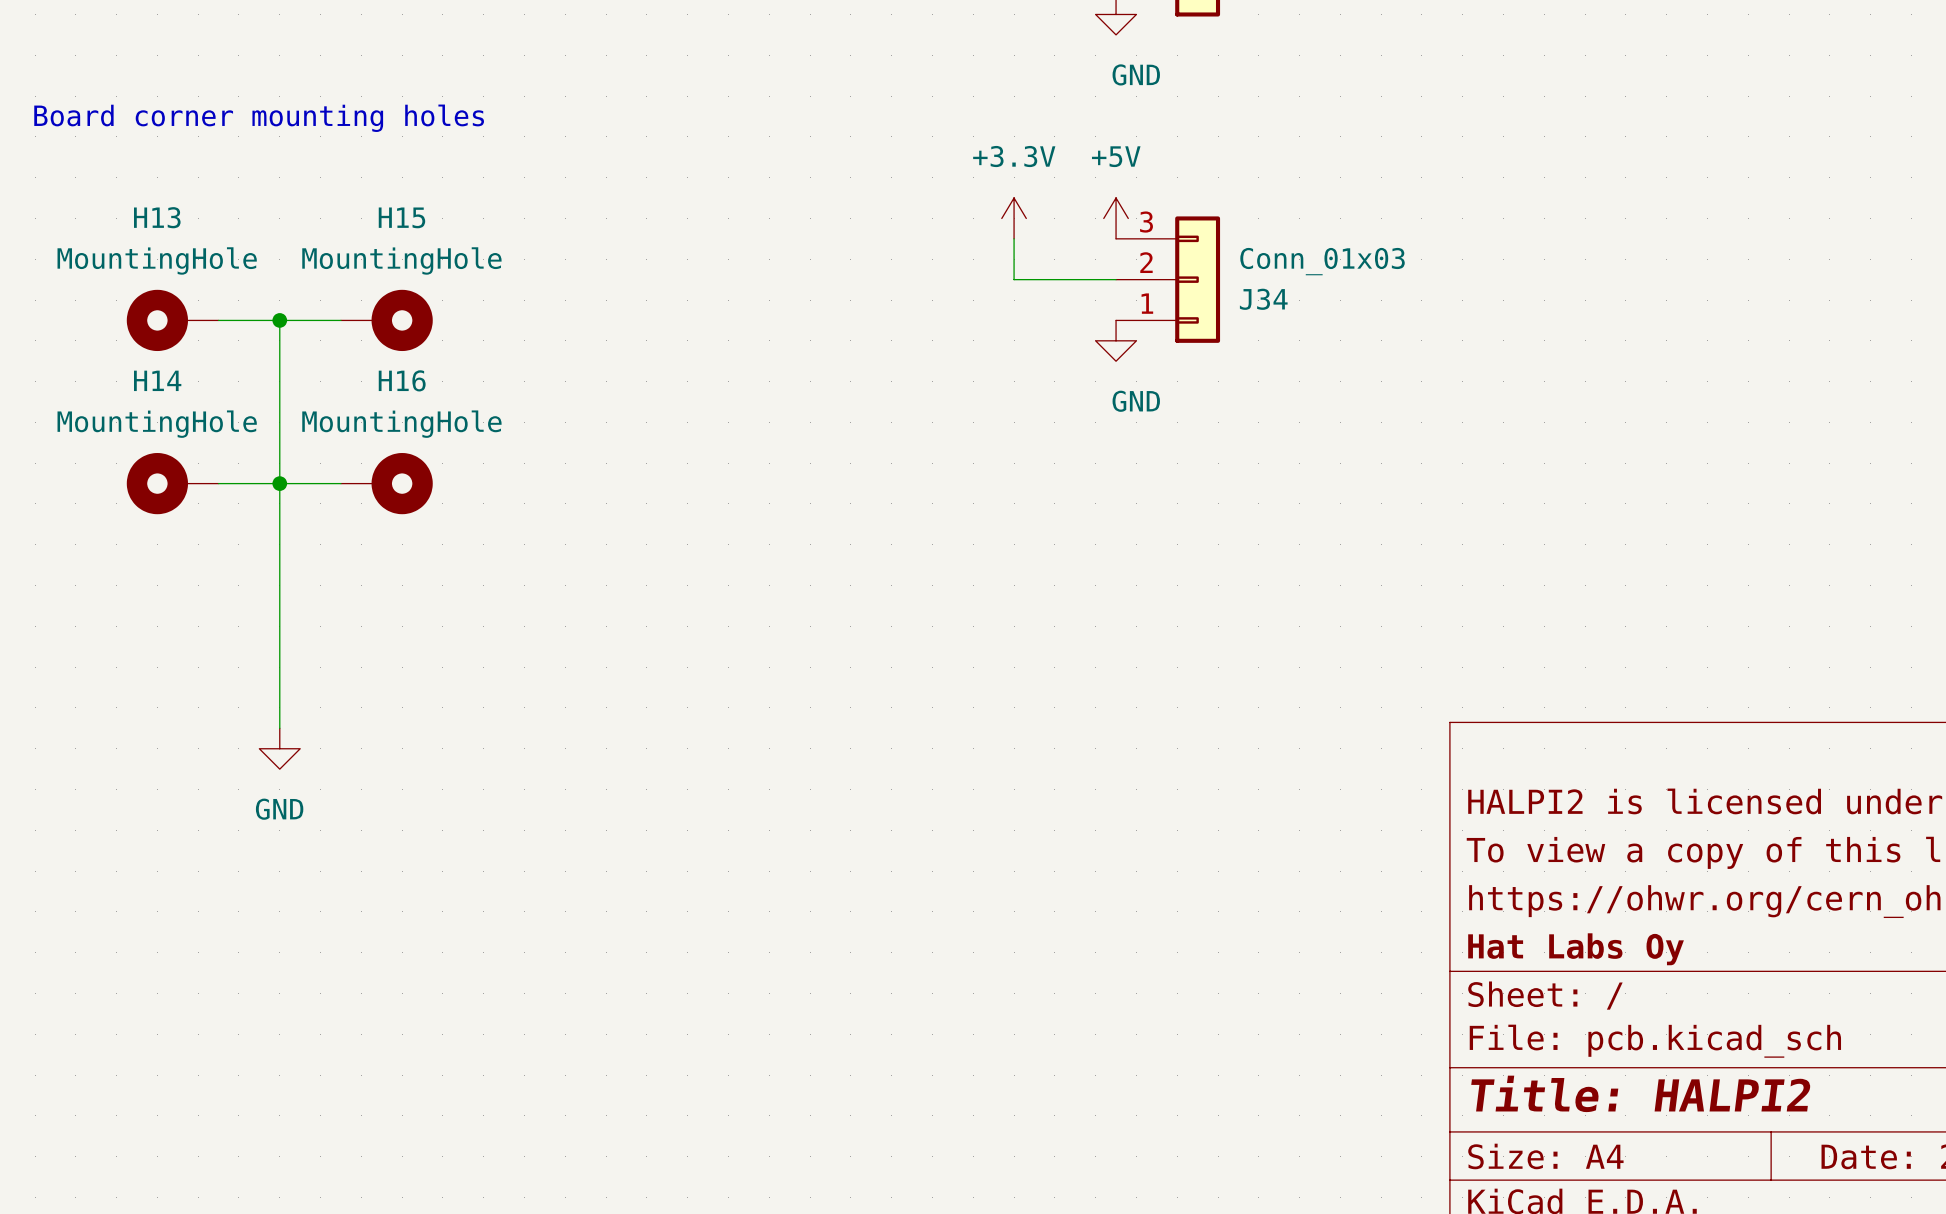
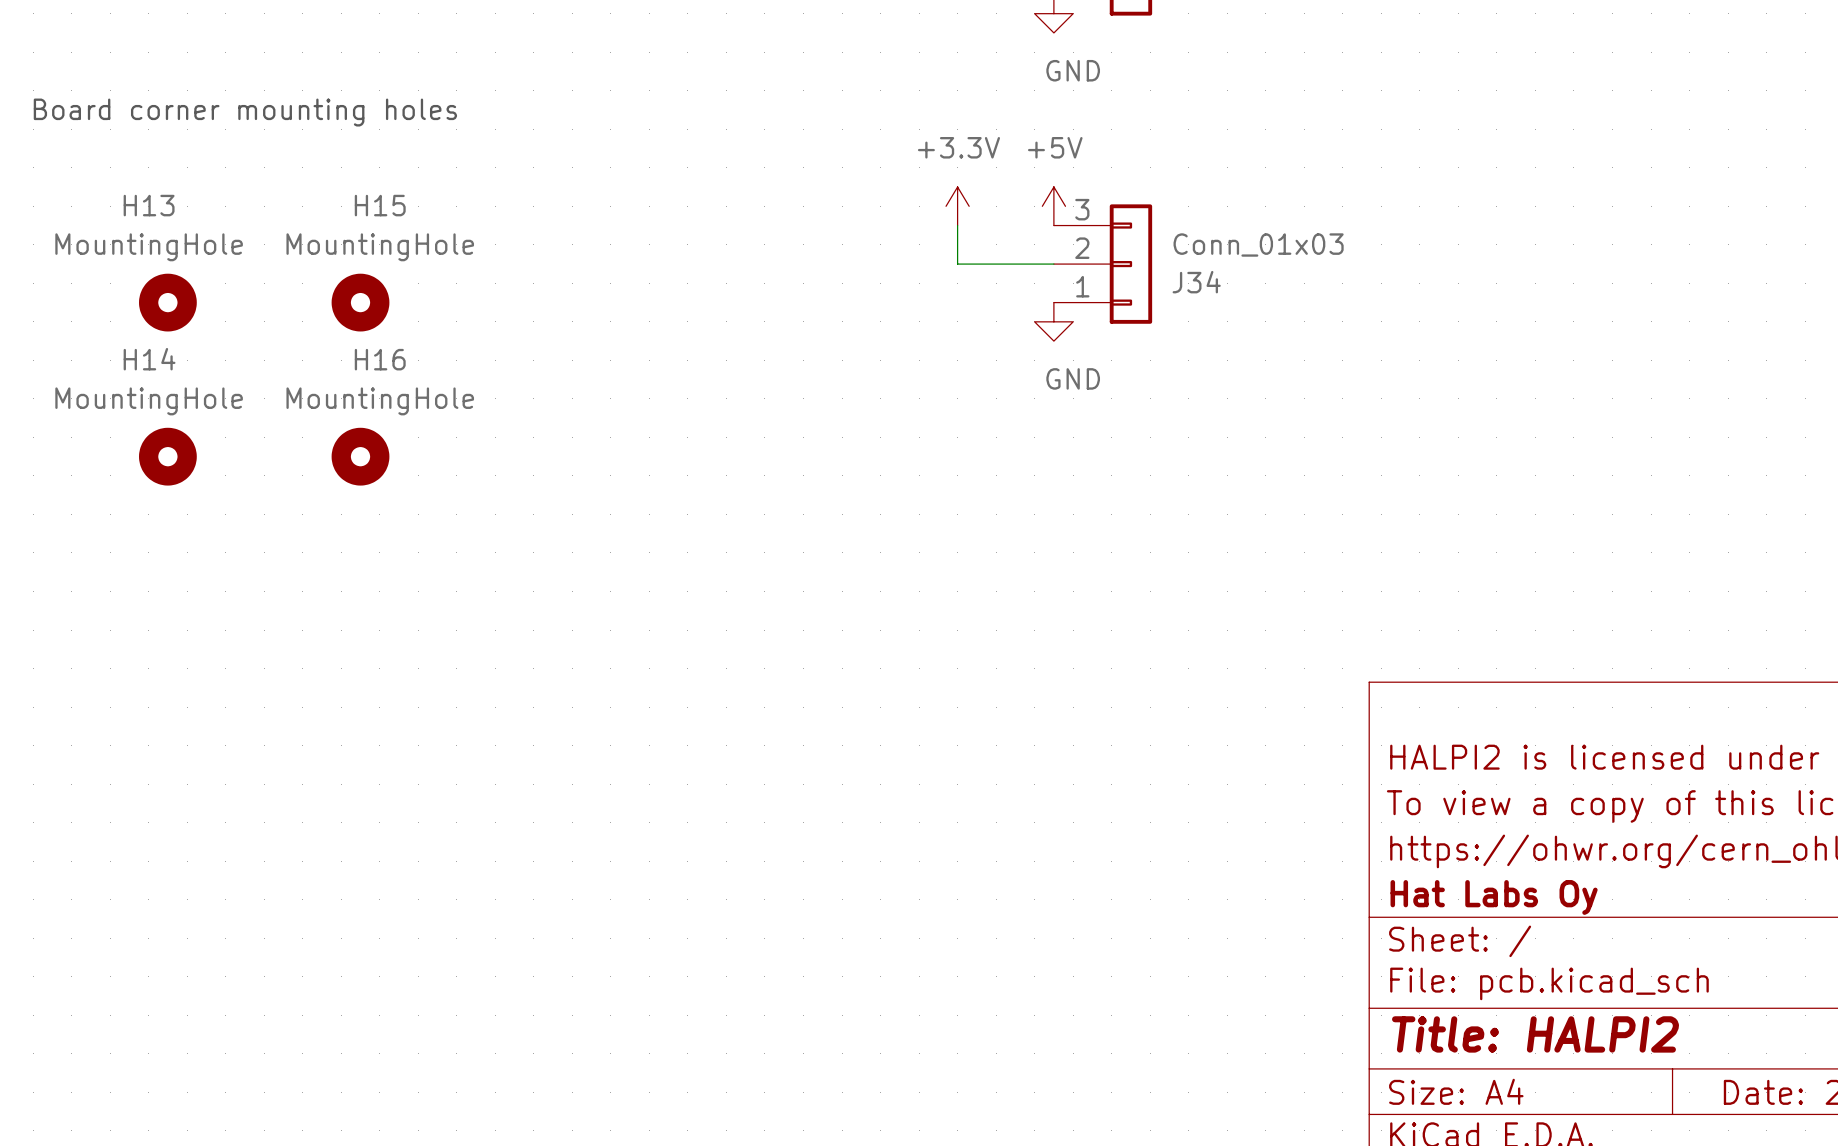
H13 symbol: [126, 289, 219, 352] -> [139, 273, 197, 332]
H15 symbol: [340, 289, 433, 352] -> [331, 273, 390, 332]
wire: (218, 320) (340, 320) -> none
wire: (279, 320) (279, 728) -> none
junction: (279, 320) -> none
H14 symbol: [126, 453, 219, 515] -> [139, 427, 197, 486]
H16 symbol: [340, 453, 433, 515] -> [331, 427, 390, 486]
wire: (218, 483) (340, 483) -> none
junction: (279, 483) -> none
power symbol: GND (279, 748) -> none

